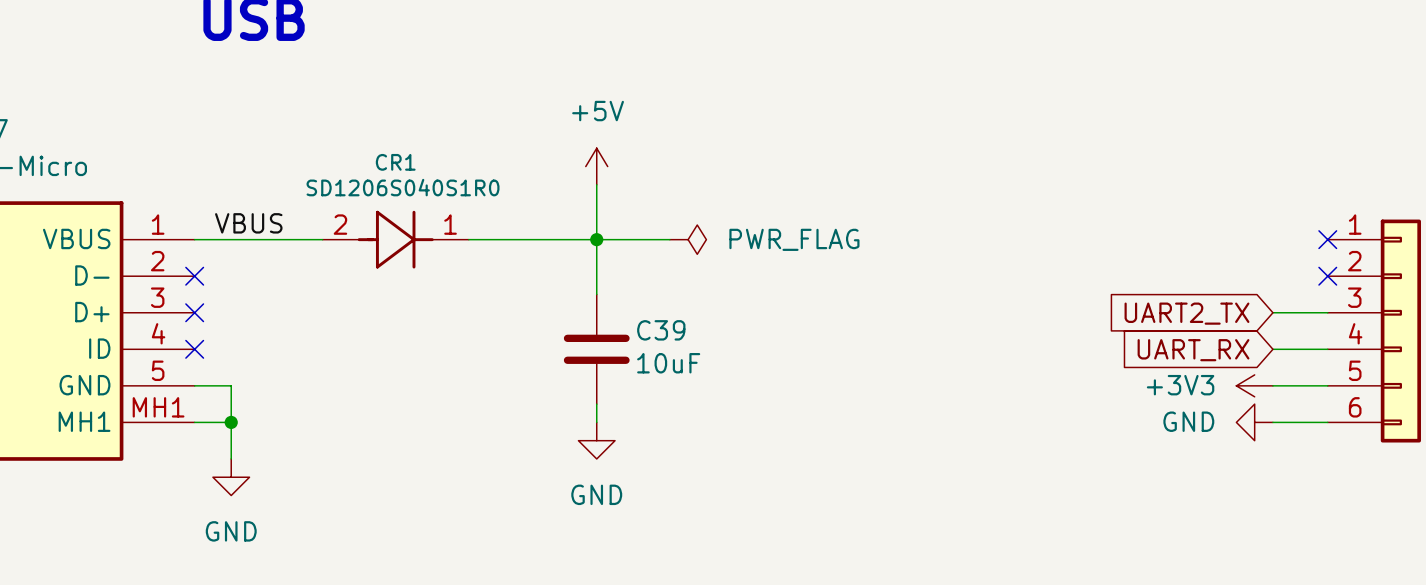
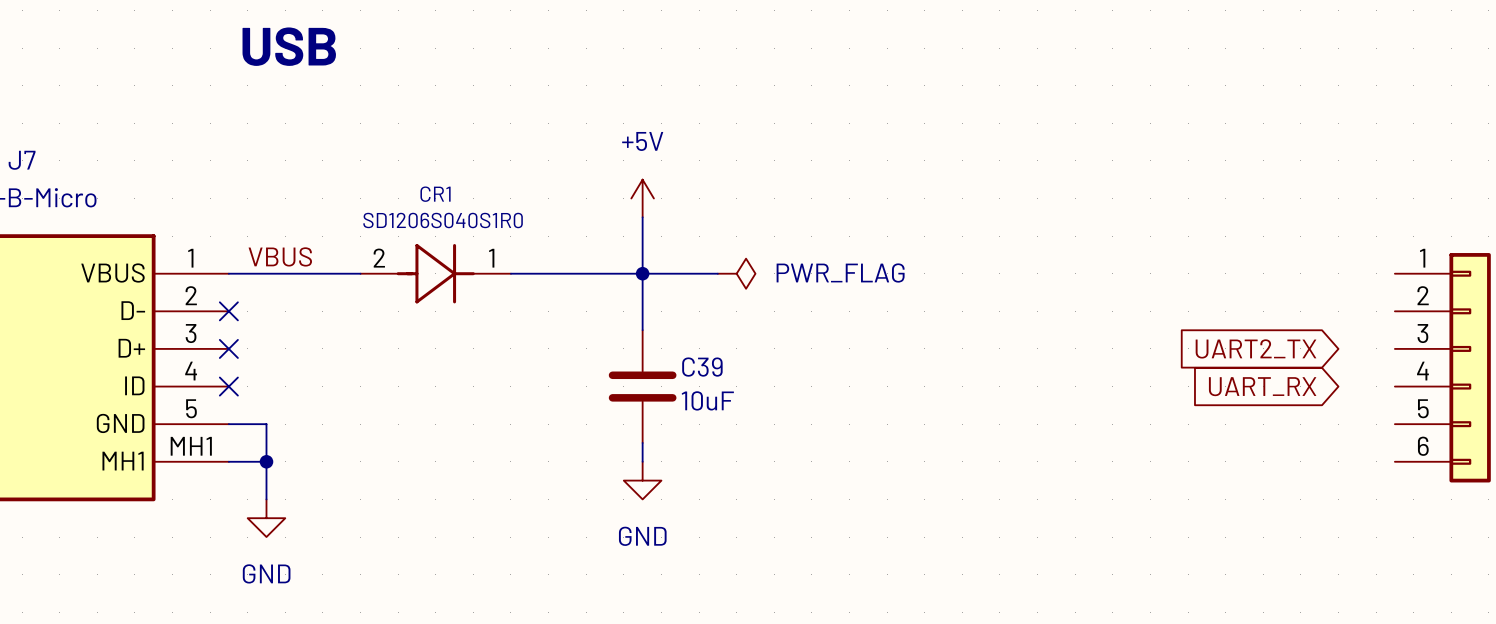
no-connect mark: (1327, 239) -> none
no-connect mark: (1327, 276) -> none
wire: (1272, 312) (1327, 312) -> none
wire: (1272, 349) (1327, 349) -> none
power symbol: +3V3 (1254, 385) -> none
wire: (1272, 385) (1327, 385) -> none
power symbol: GND (1254, 422) -> none
wire: (1272, 422) (1327, 422) -> none

